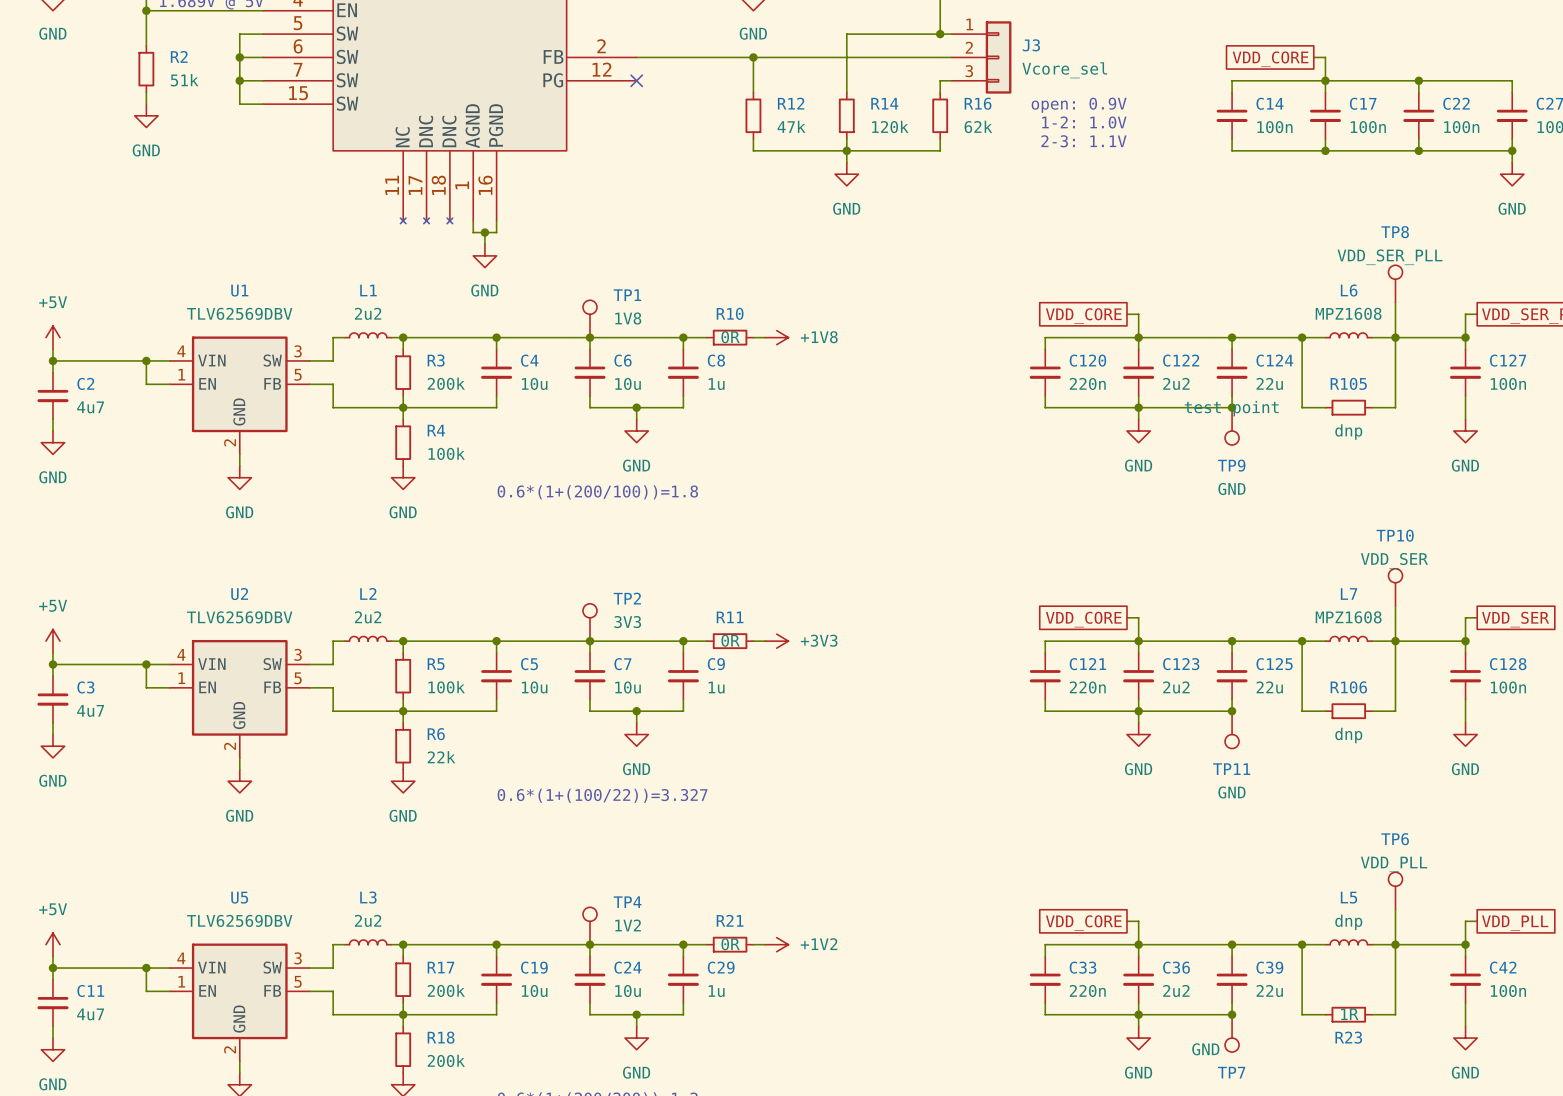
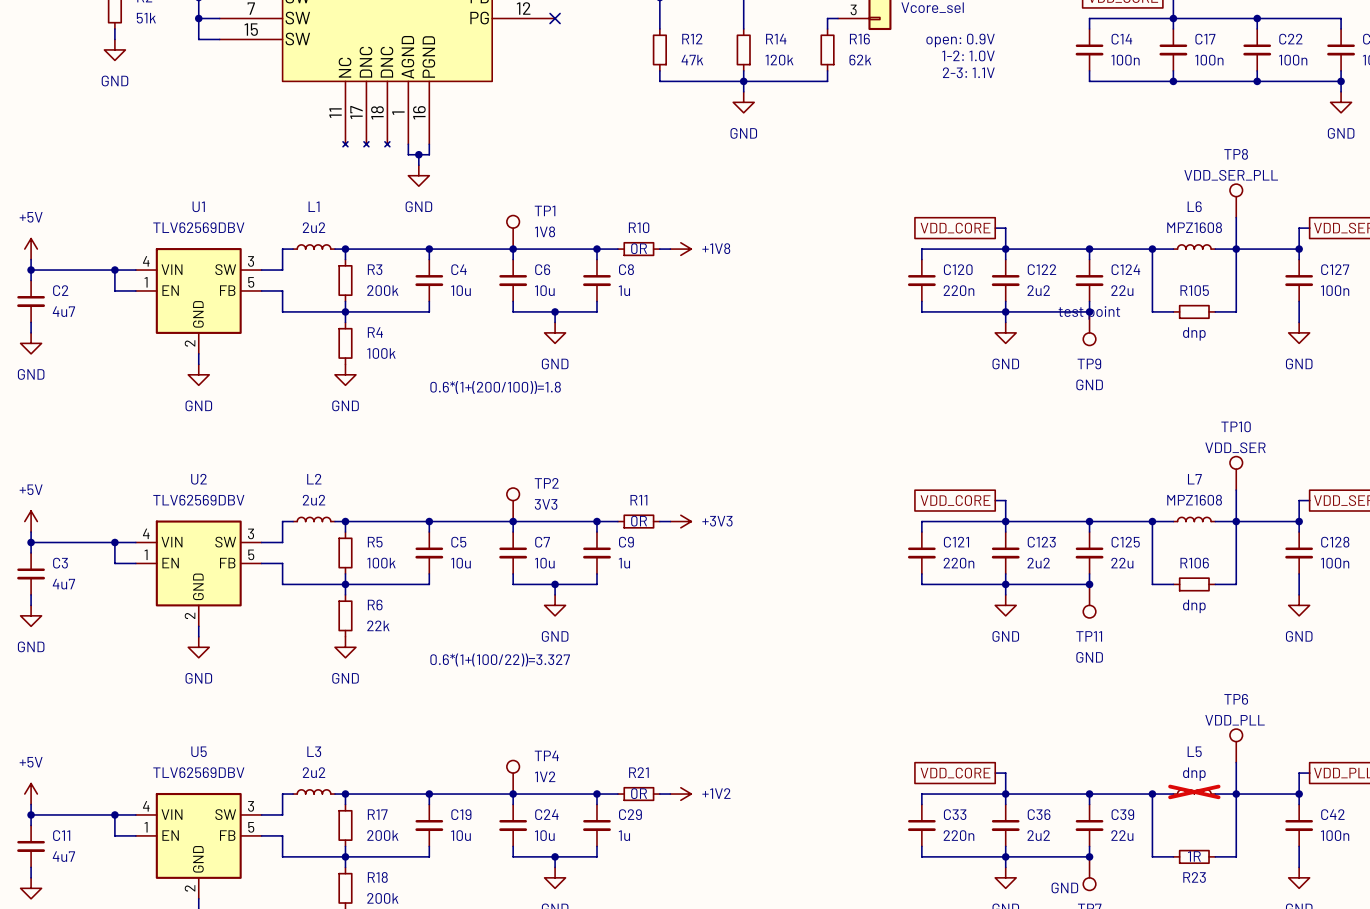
L5 do-not-place cross: none -> (1194, 791)

